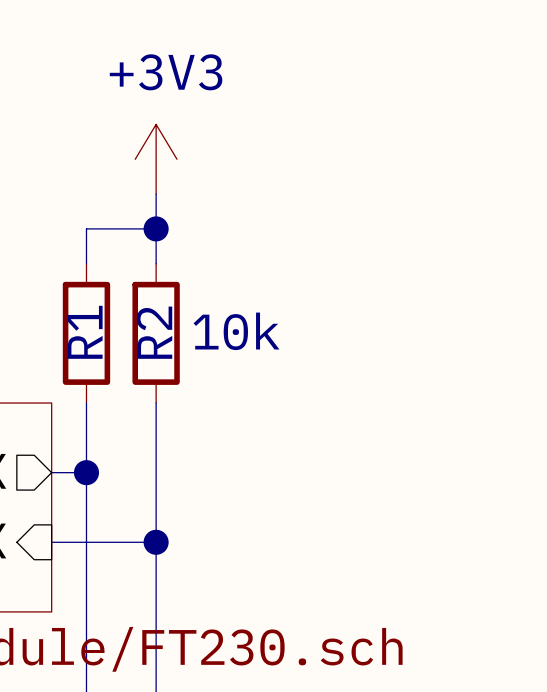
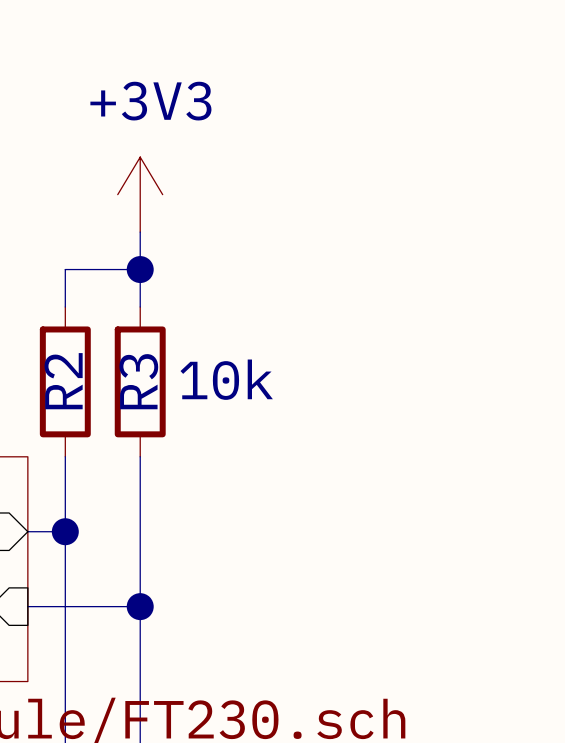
R1 name: R1 (85, 332) -> R2 (63, 381)
R2 name: R2 (154, 332) -> R3 (138, 381)

